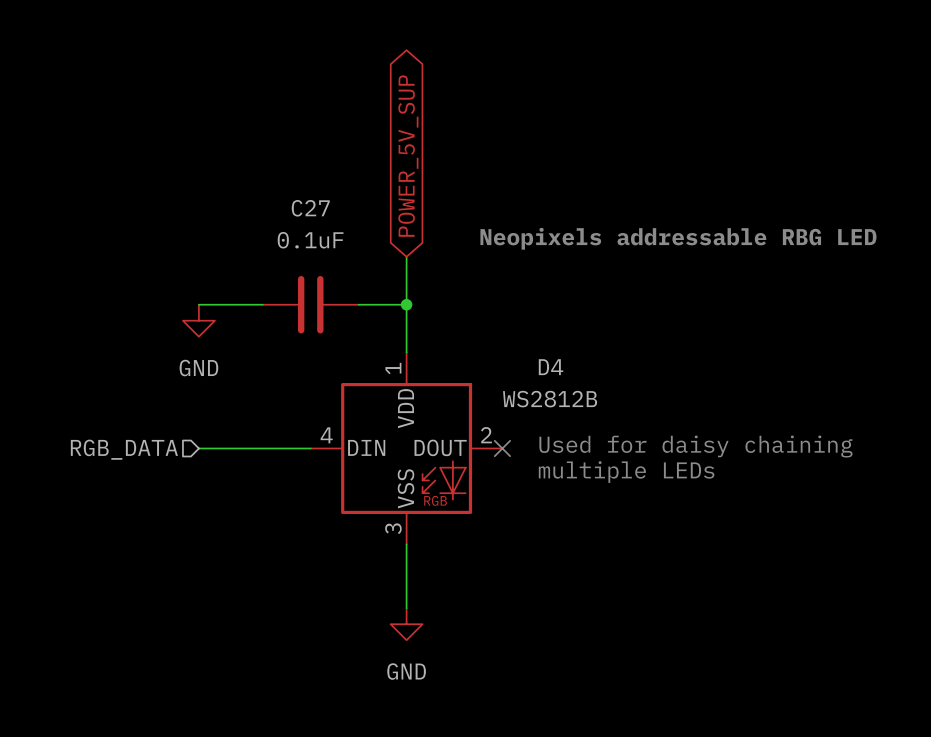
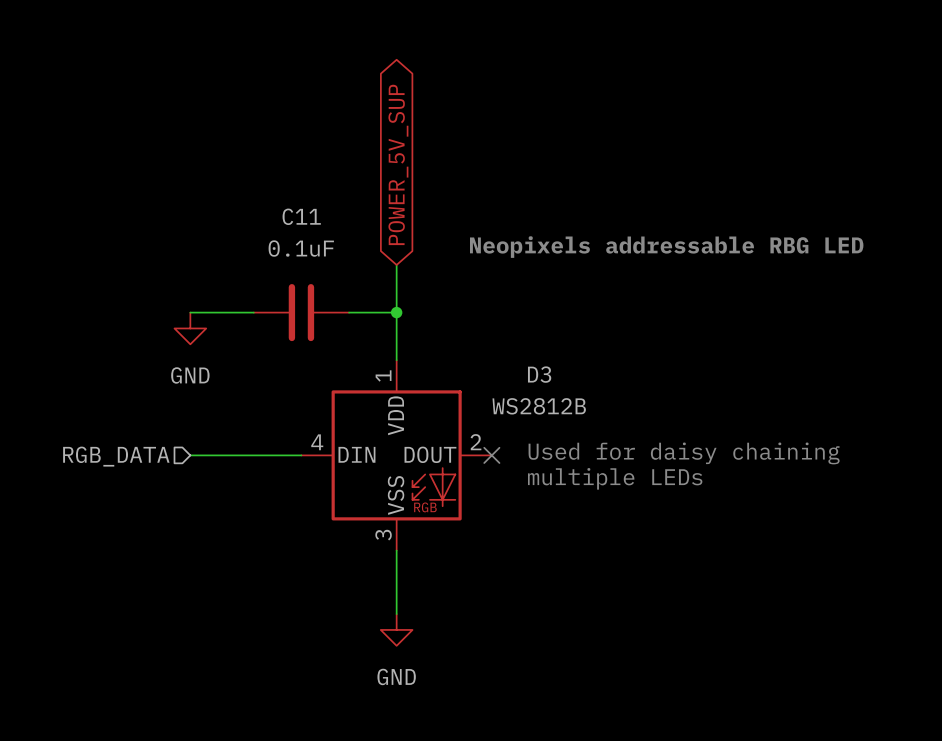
C27 name: C27 (310, 208) -> C11 (301, 216)
D4 name: D4 (551, 367) -> D3 (539, 374)

